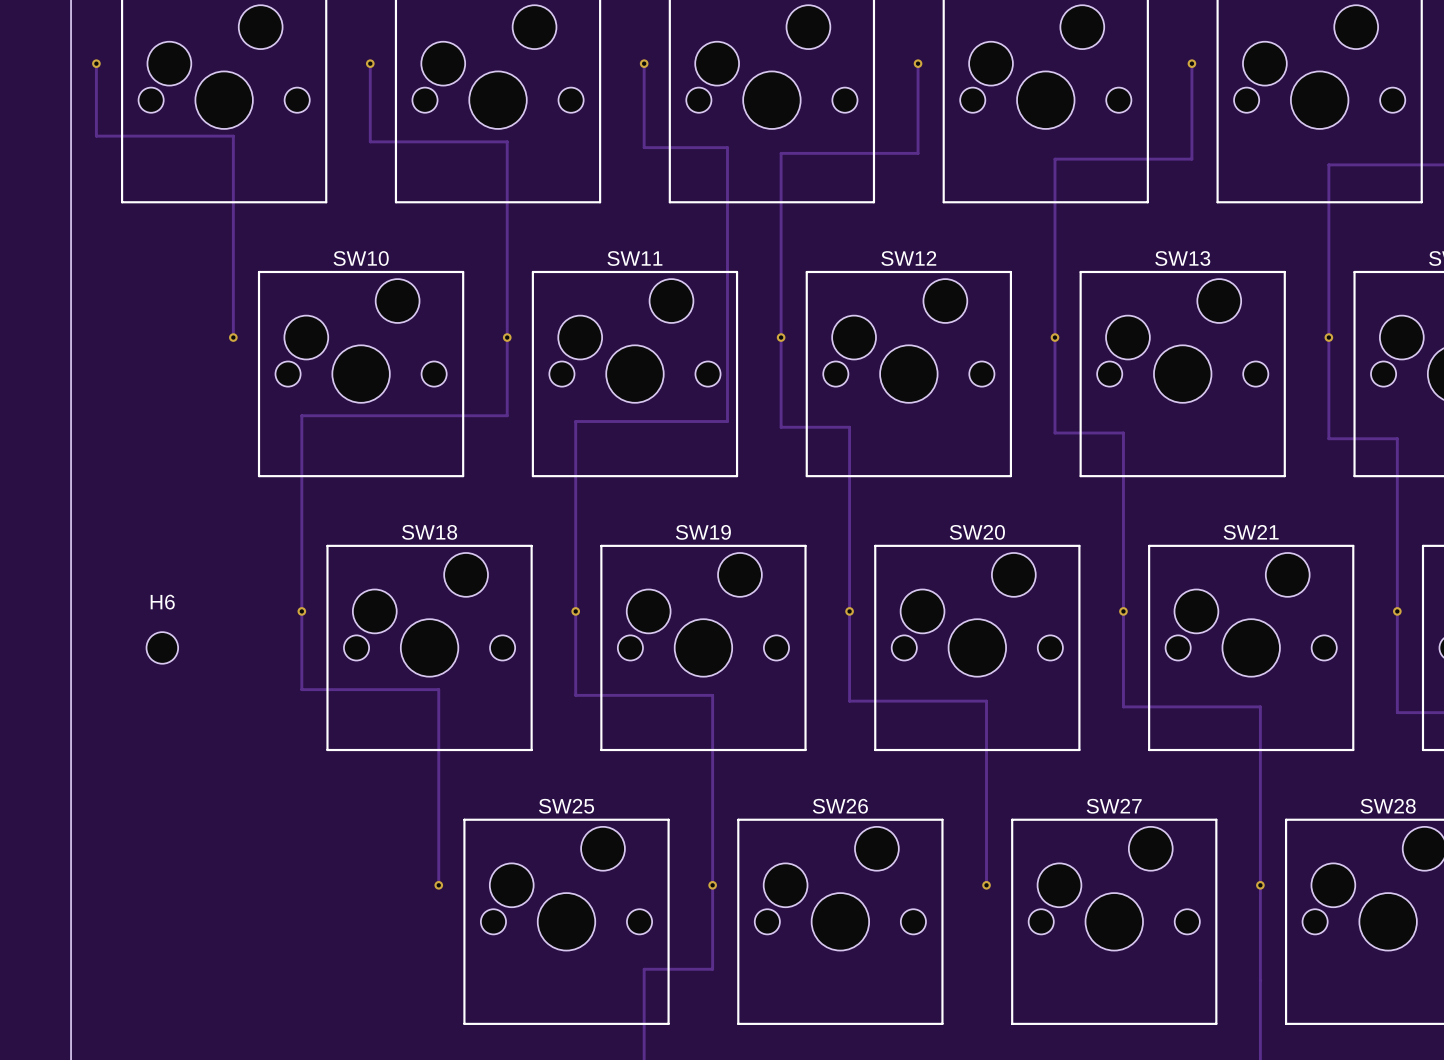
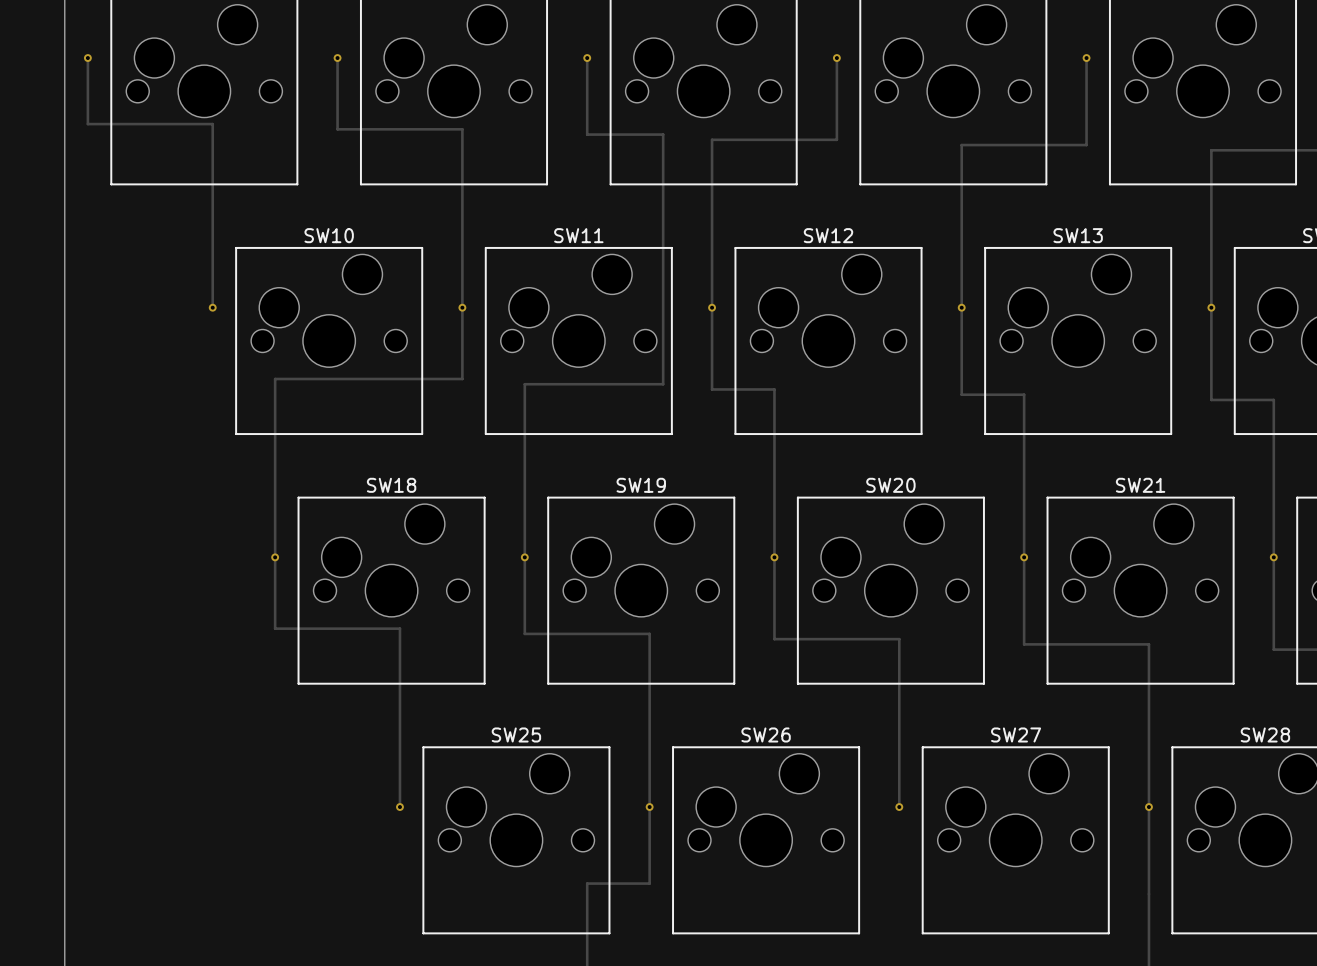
H6: (162, 647) -> none

